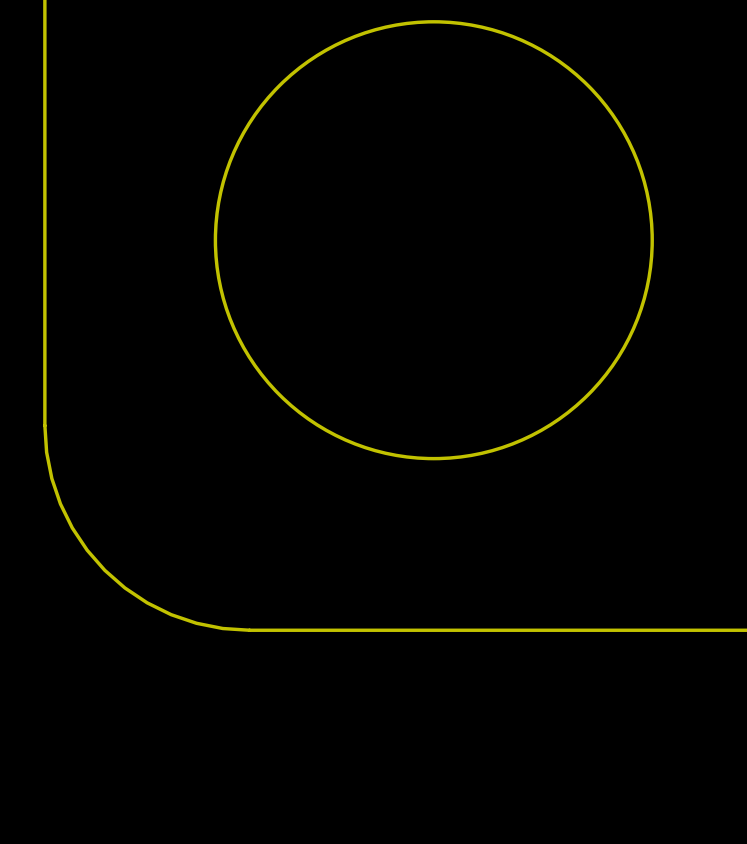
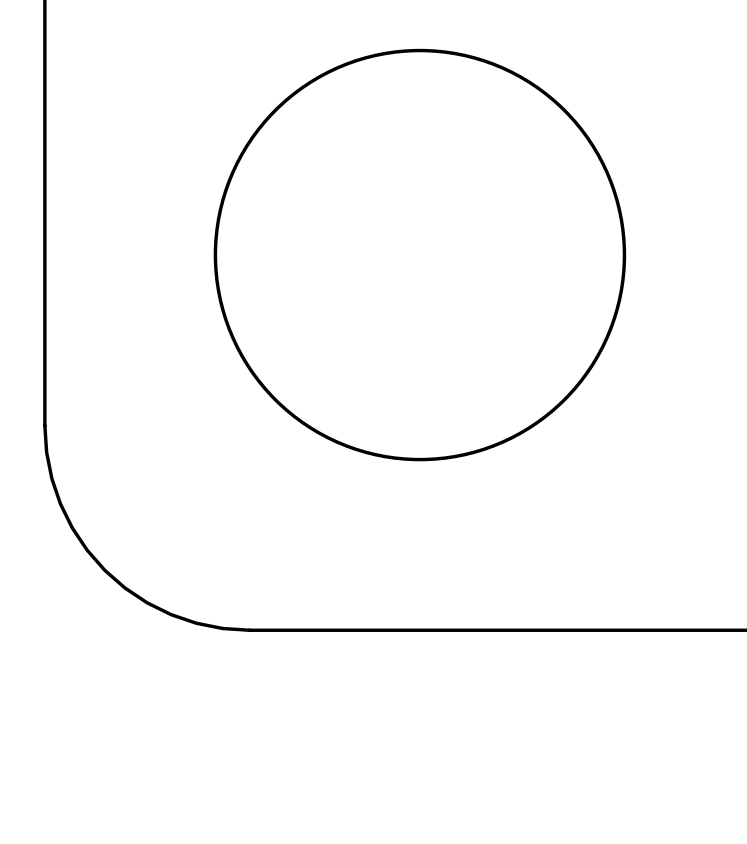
round board edge size: [213, 20, 654, 461] -> [213, 48, 627, 462]

